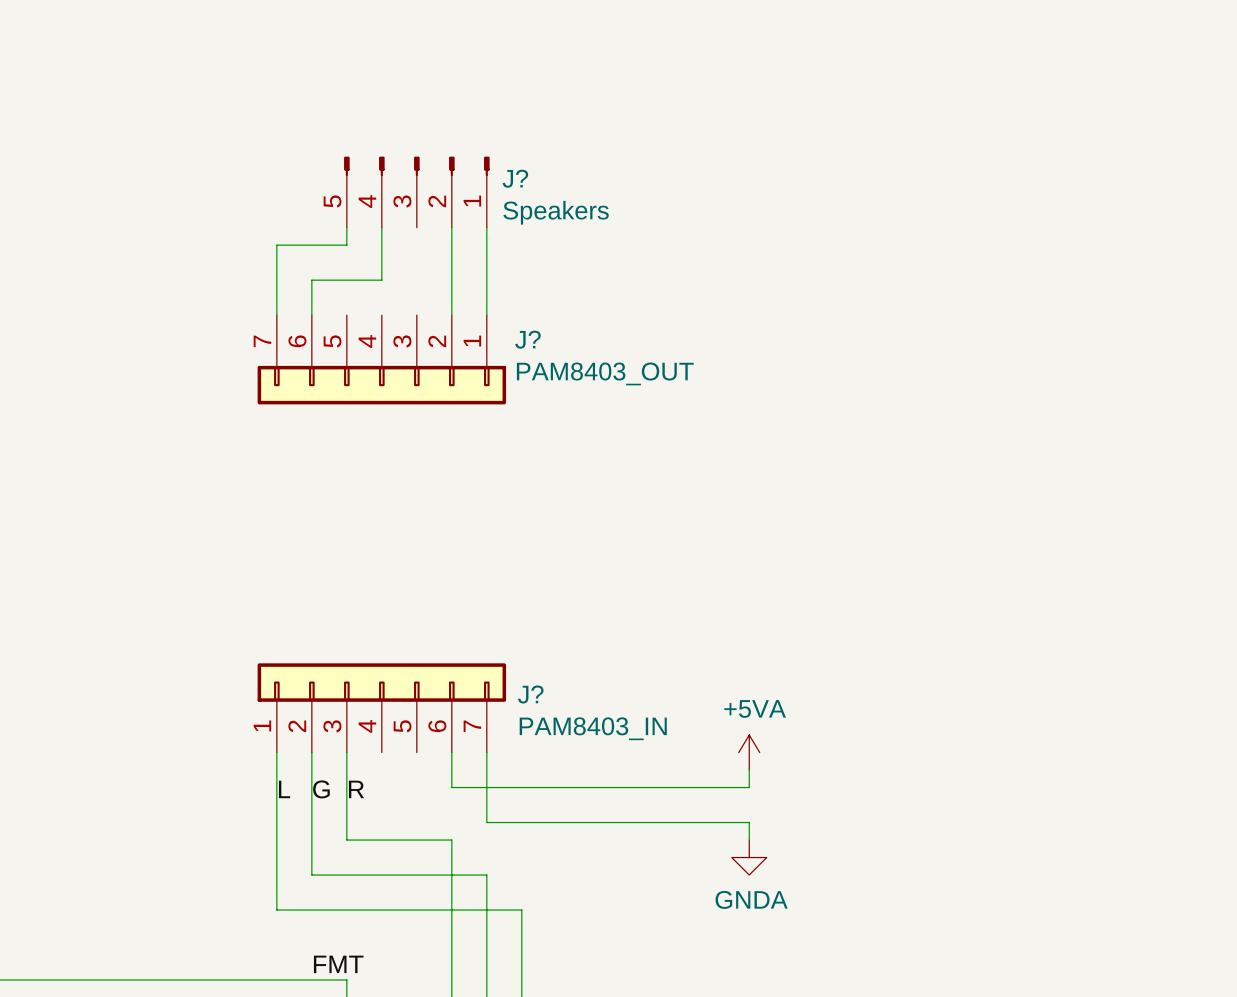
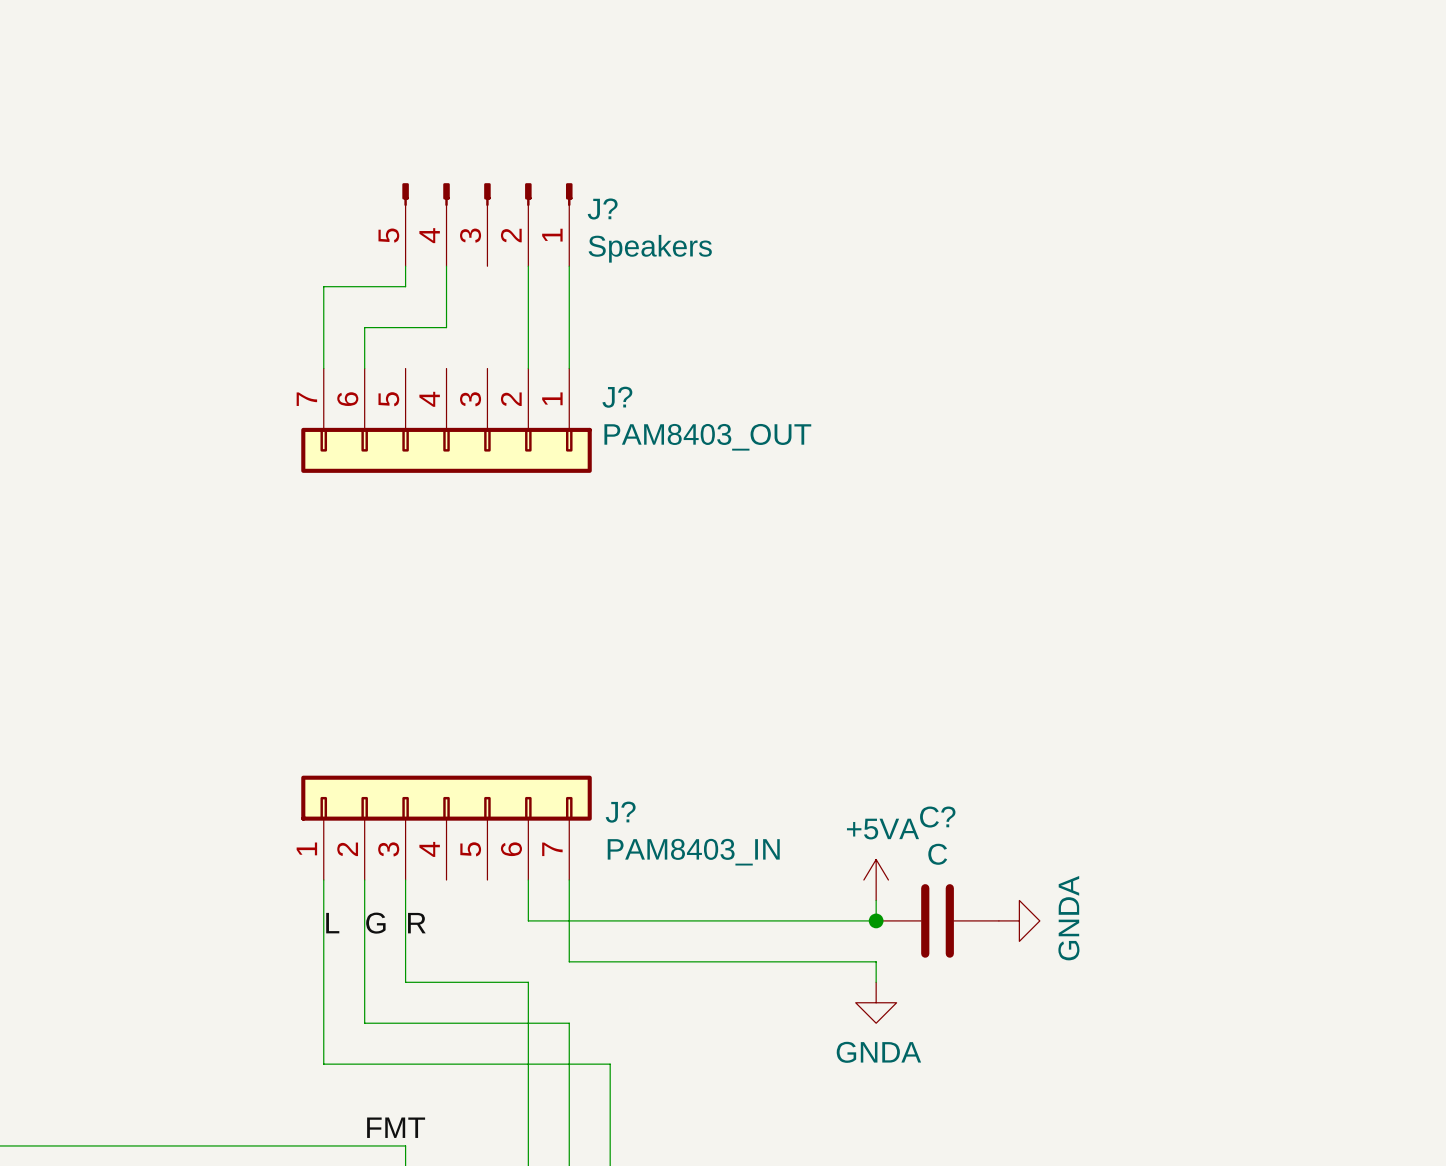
junction: none -> (876, 920)
C?: none -> C (937, 920)
power symbol: none -> GNDA (1019, 920)

